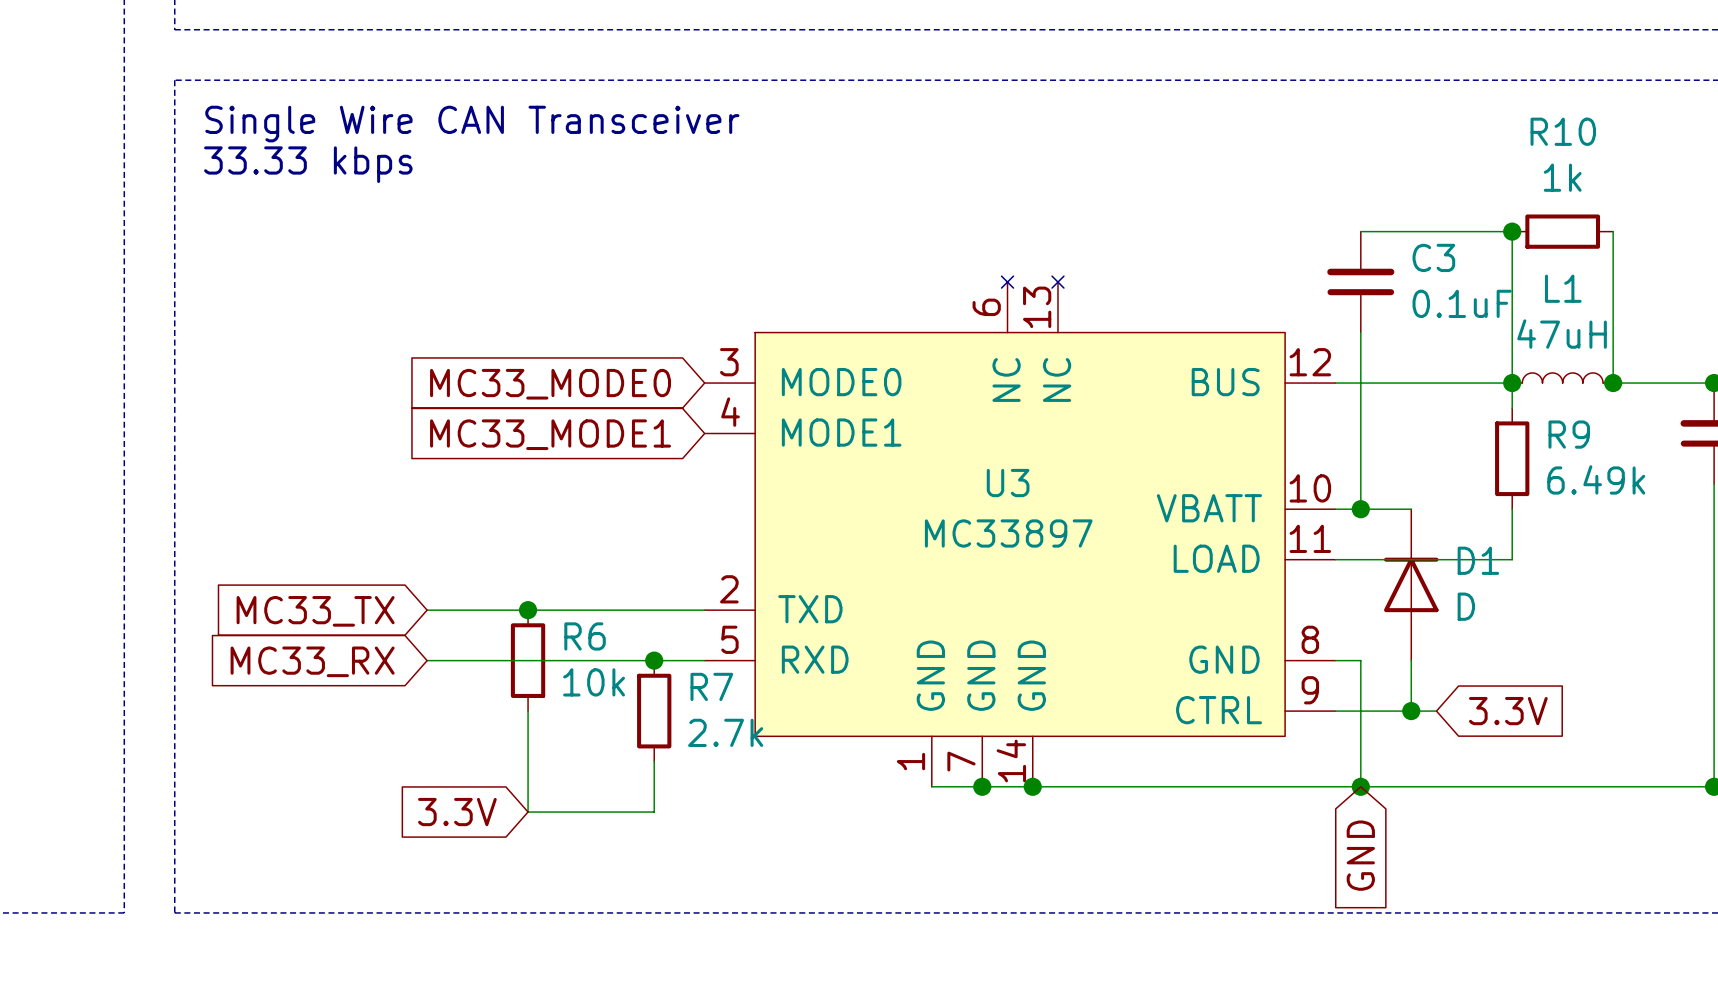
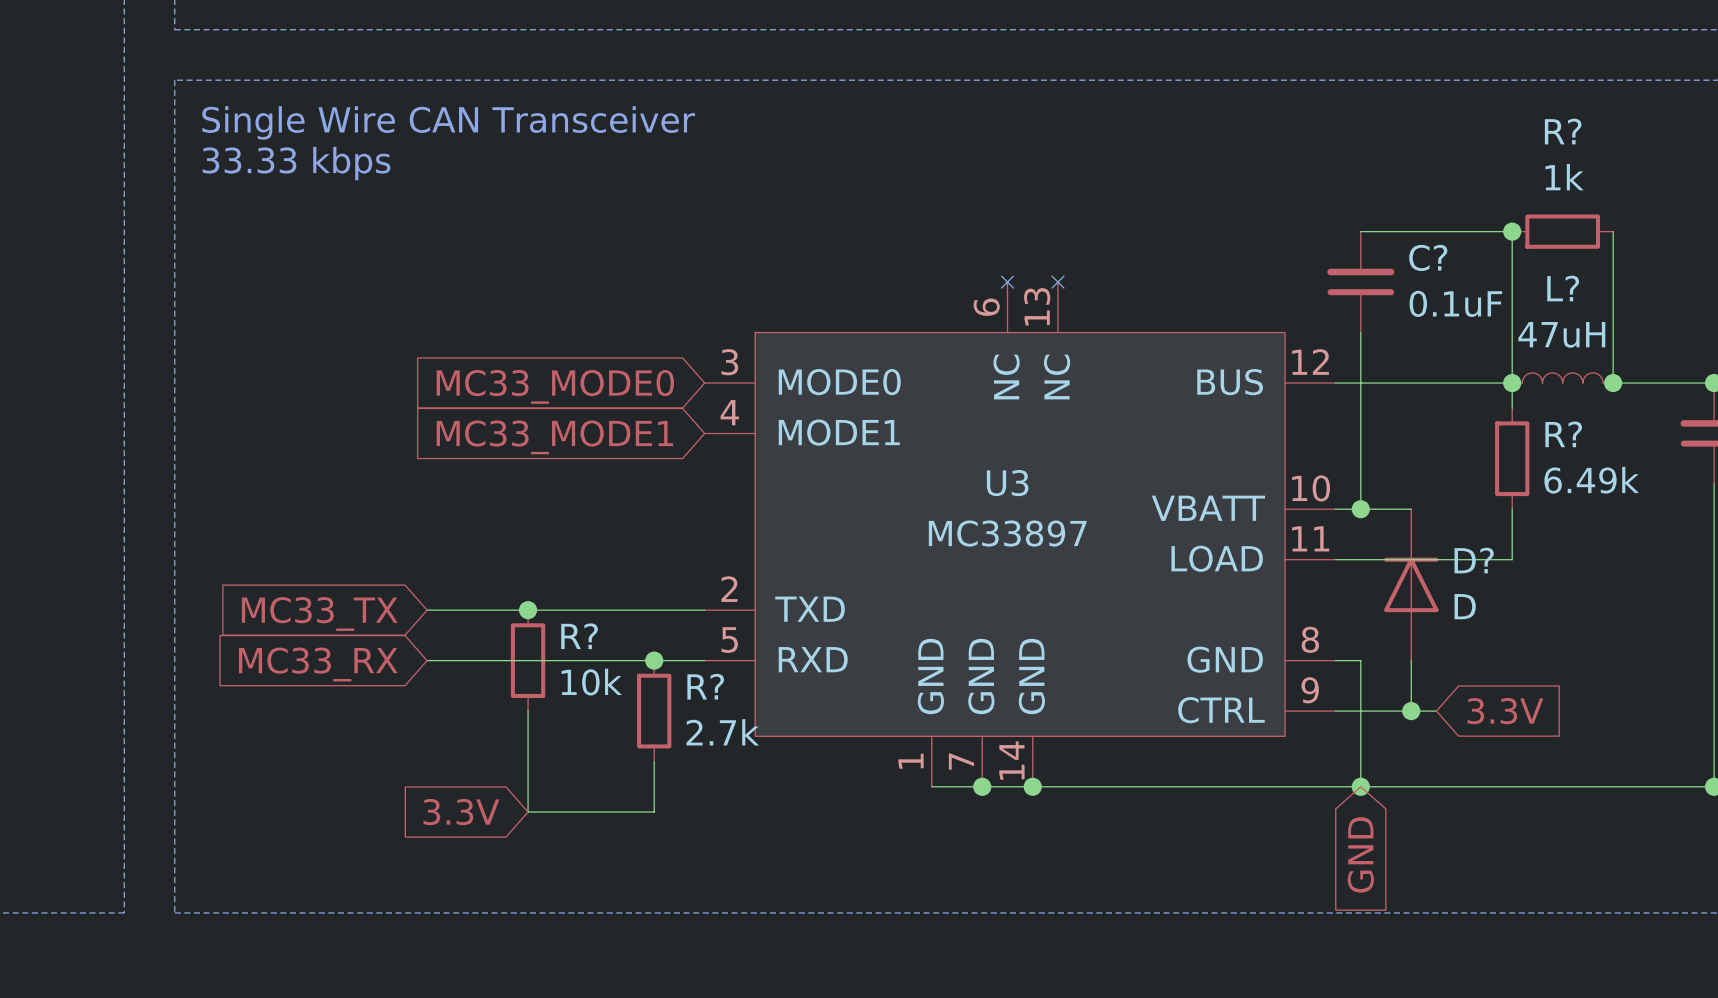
R10 name: R10 (1563, 131) -> R? (1563, 131)
C3 name: C3 (1433, 257) -> C? (1428, 257)
L1 name: L1 (1563, 288) -> L? (1563, 288)
R9 name: R9 (1569, 434) -> R? (1563, 434)
D1 name: D1 (1478, 560) -> D? (1474, 560)
R6 name: R6 (585, 636) -> R? (579, 636)
R7 name: R7 (711, 686) -> R? (705, 686)

